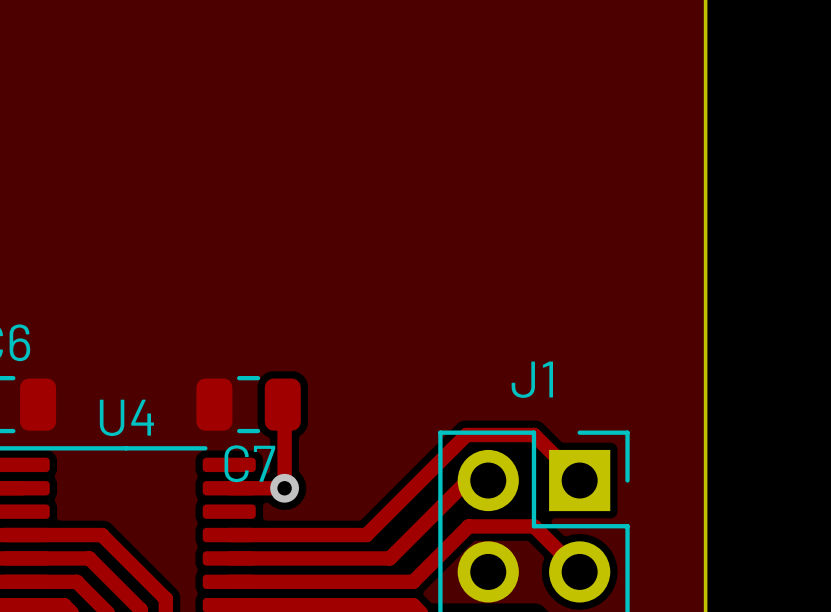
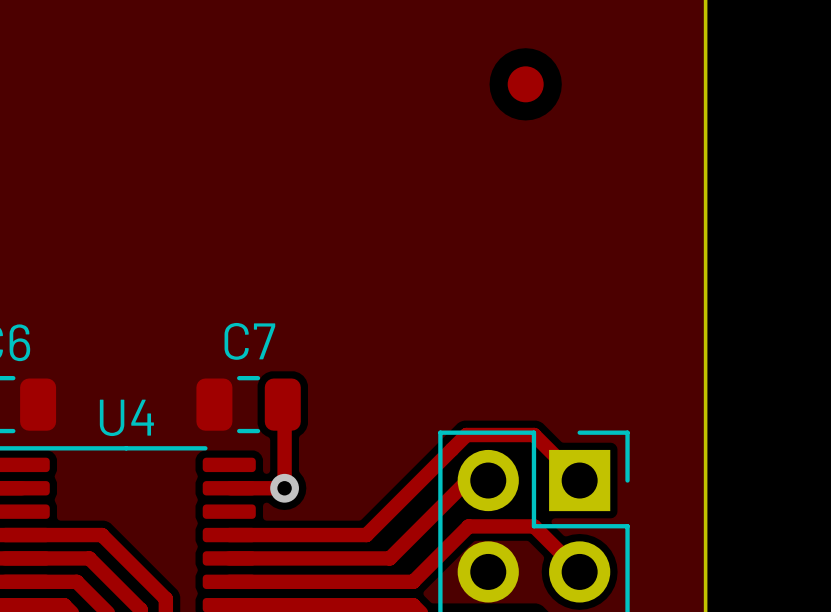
part: none -> (525, 84)
J1 name: J1 (532, 379) -> none
C7 name position: C7 (249, 463) -> C7 (249, 341)

